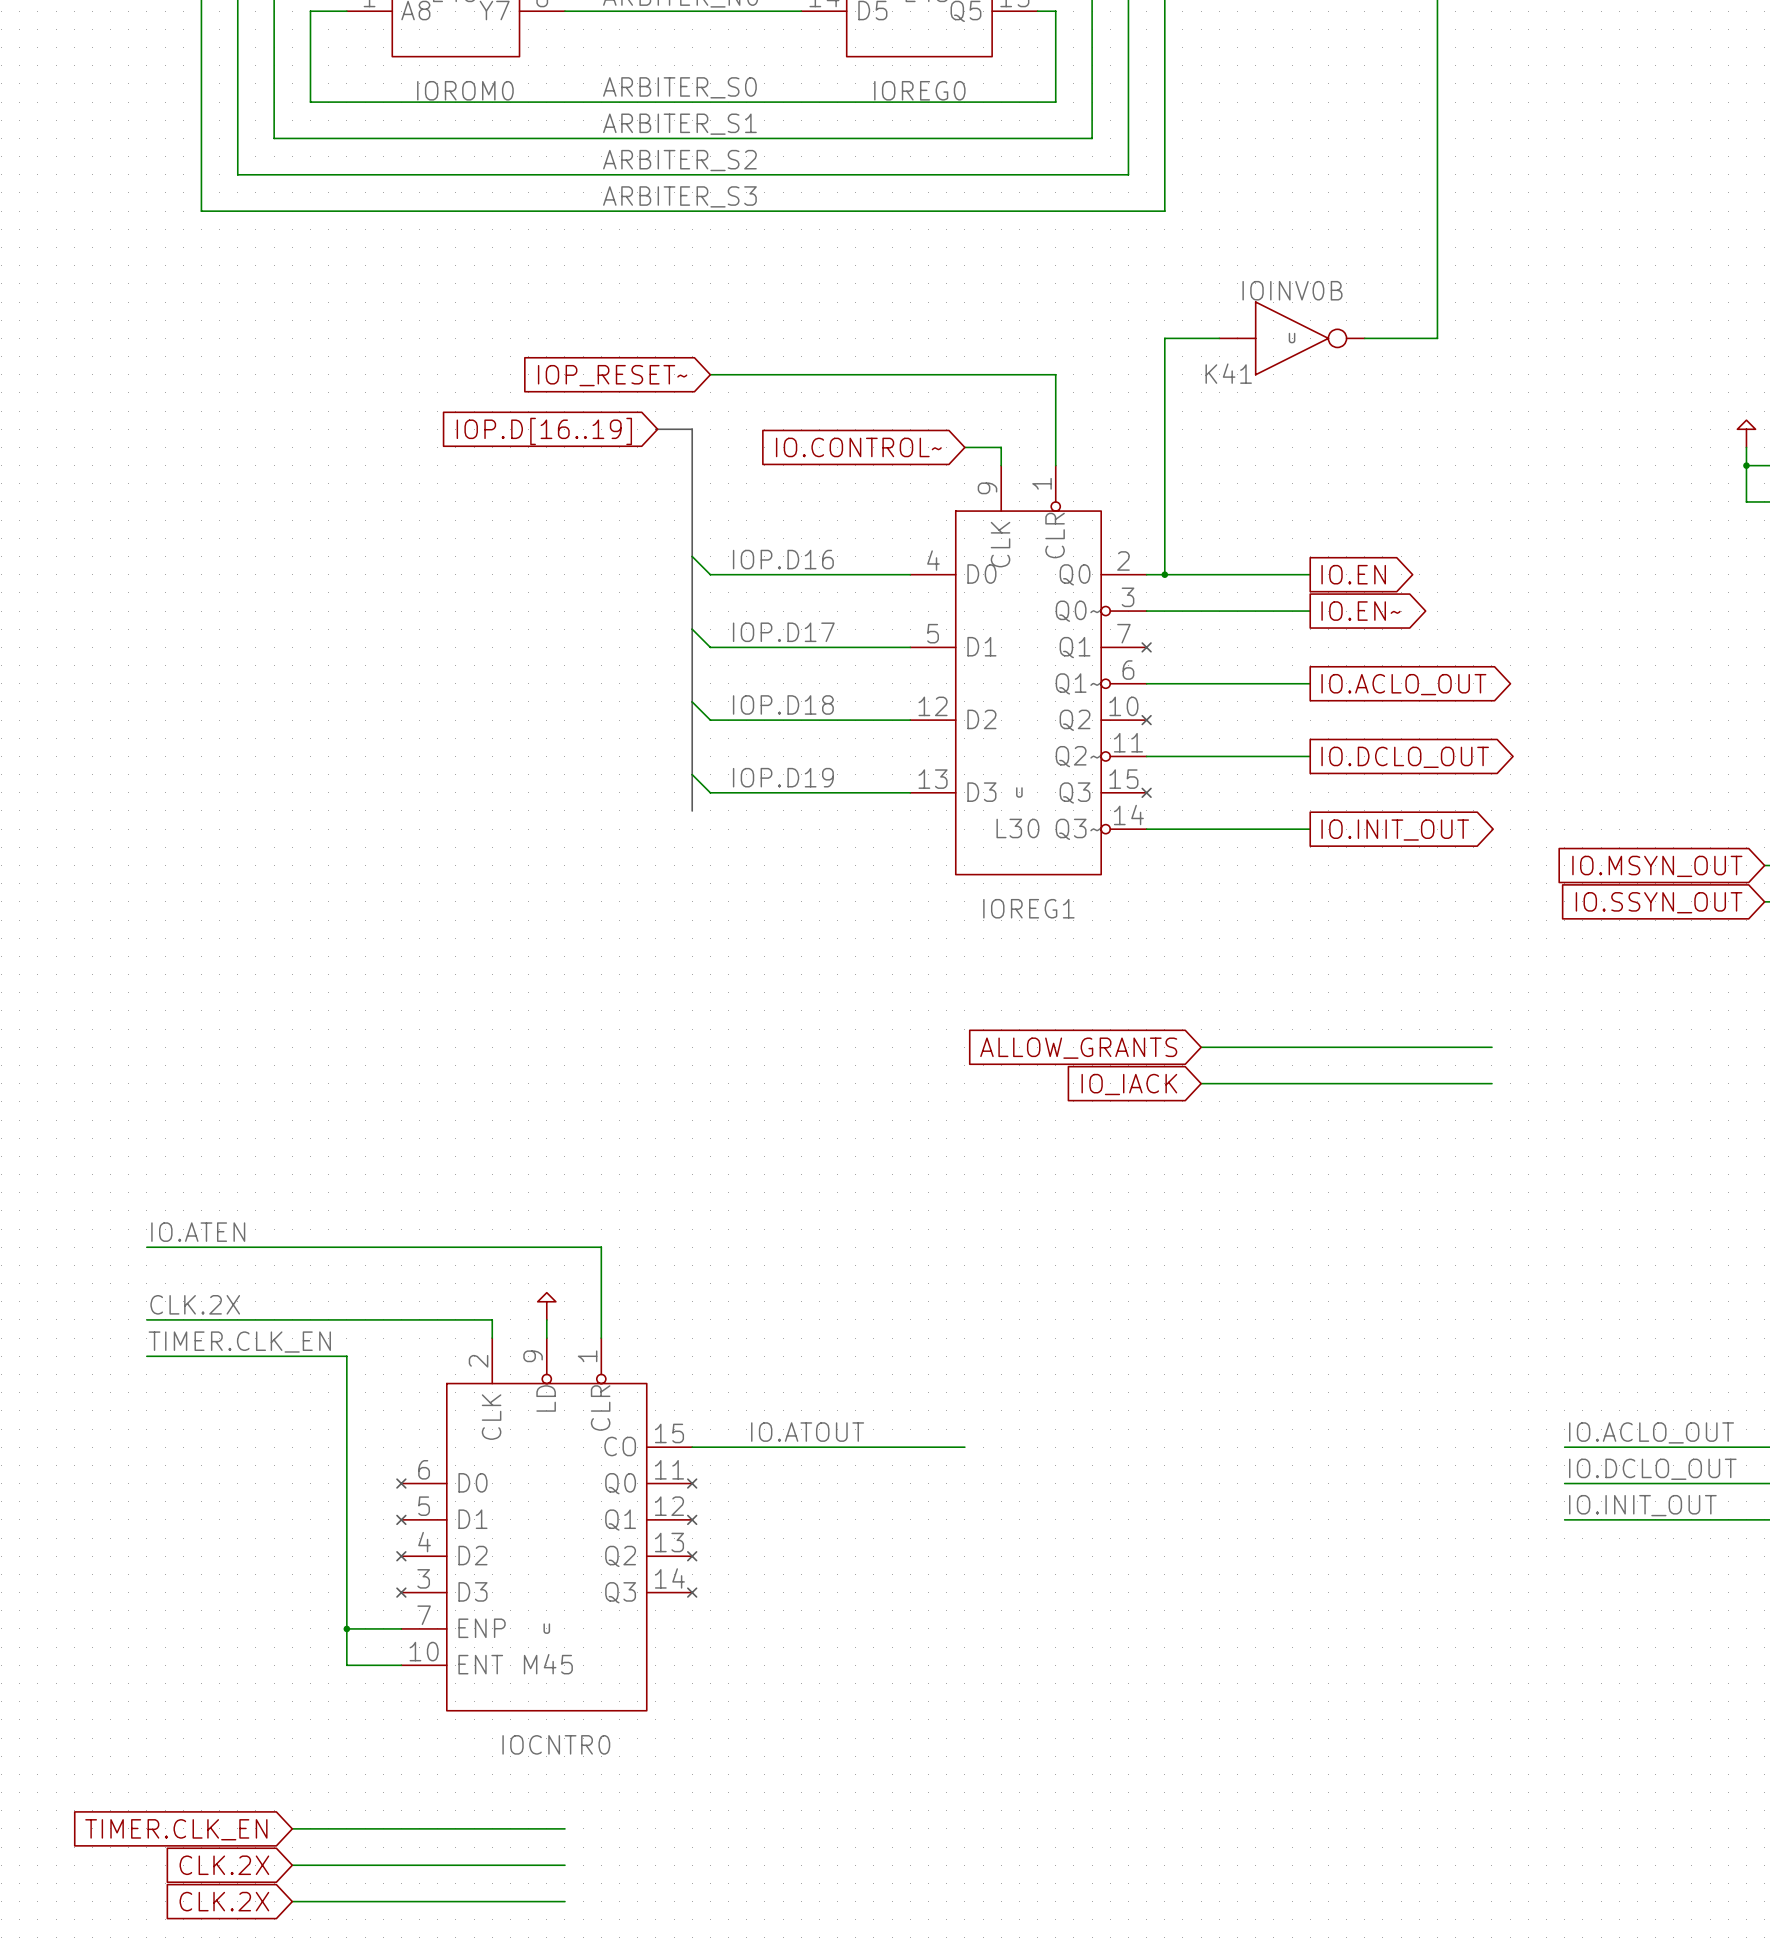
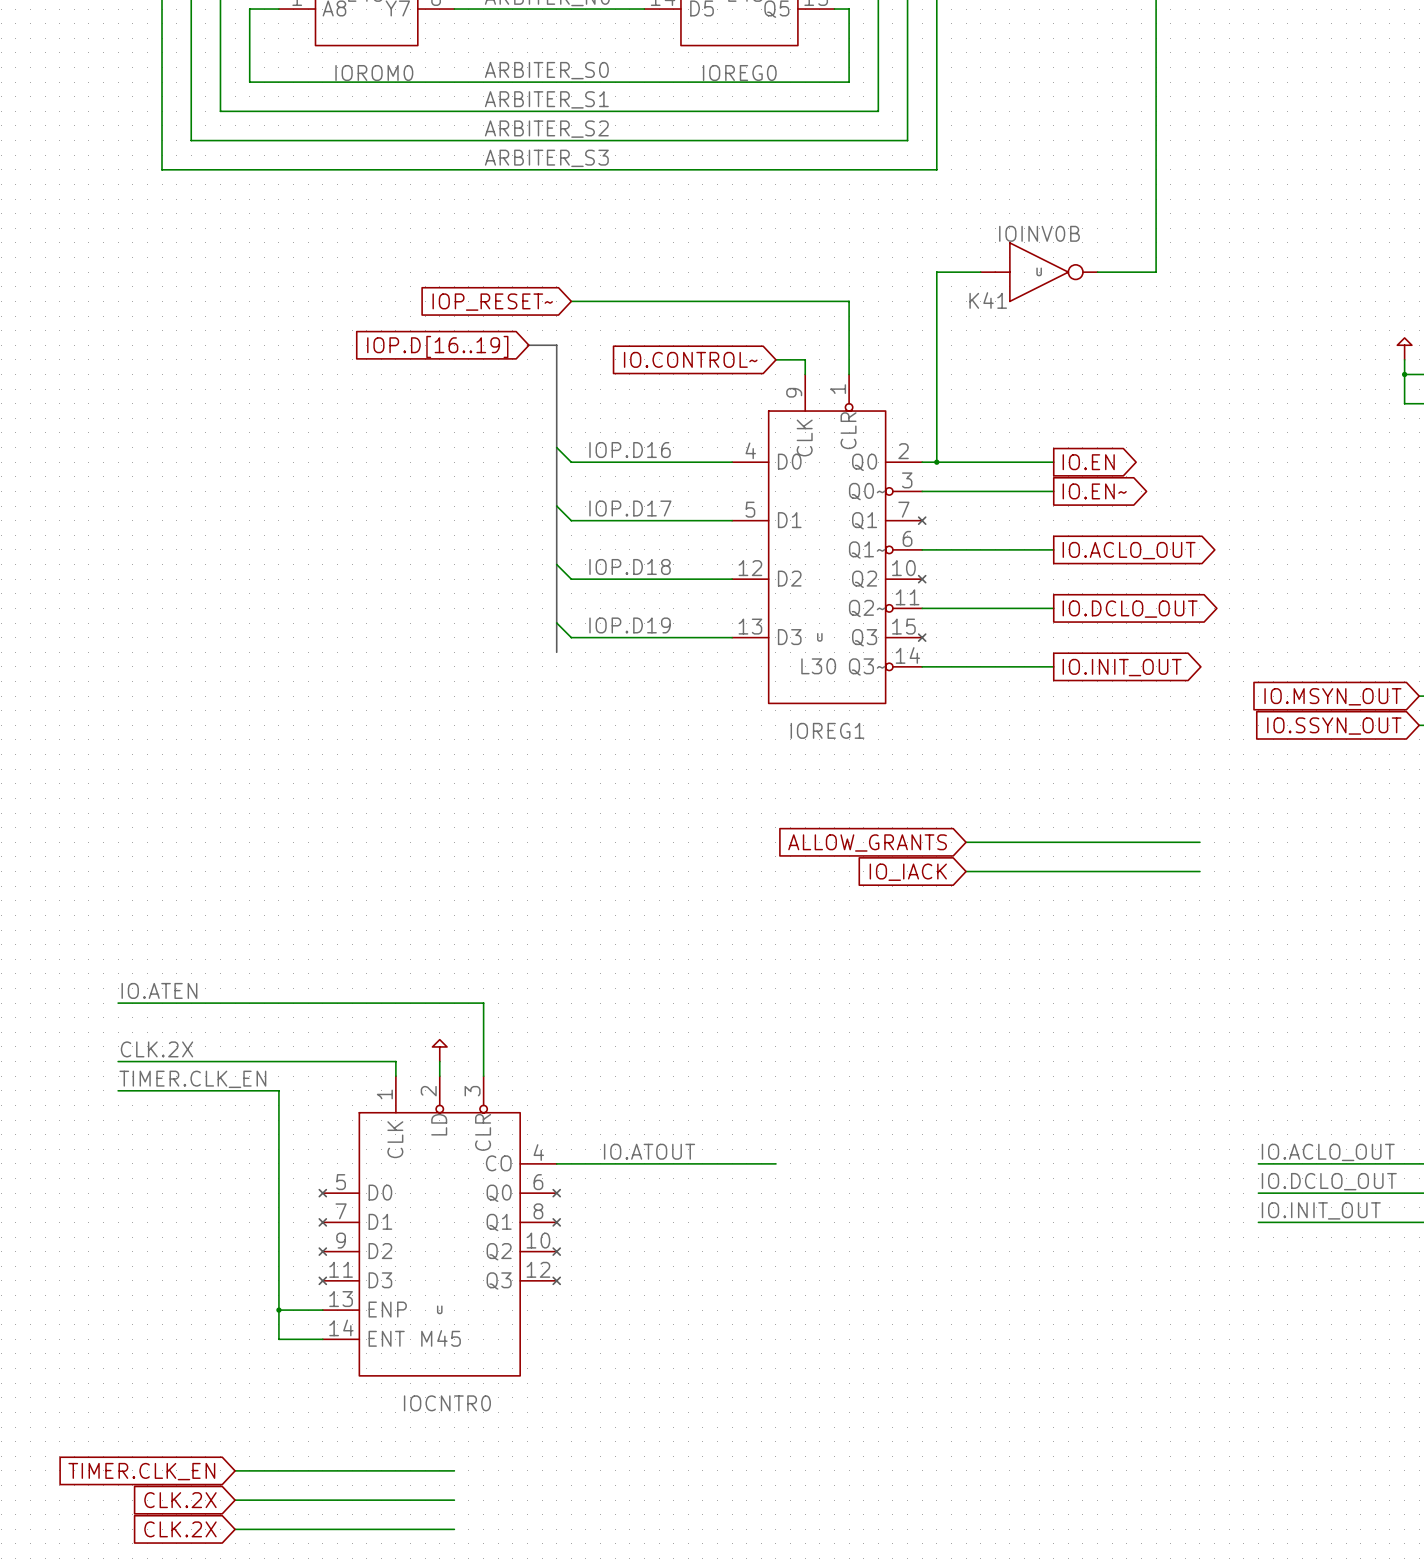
U symbol: [401, 1338, 693, 1711] -> [322, 1076, 557, 1376]

